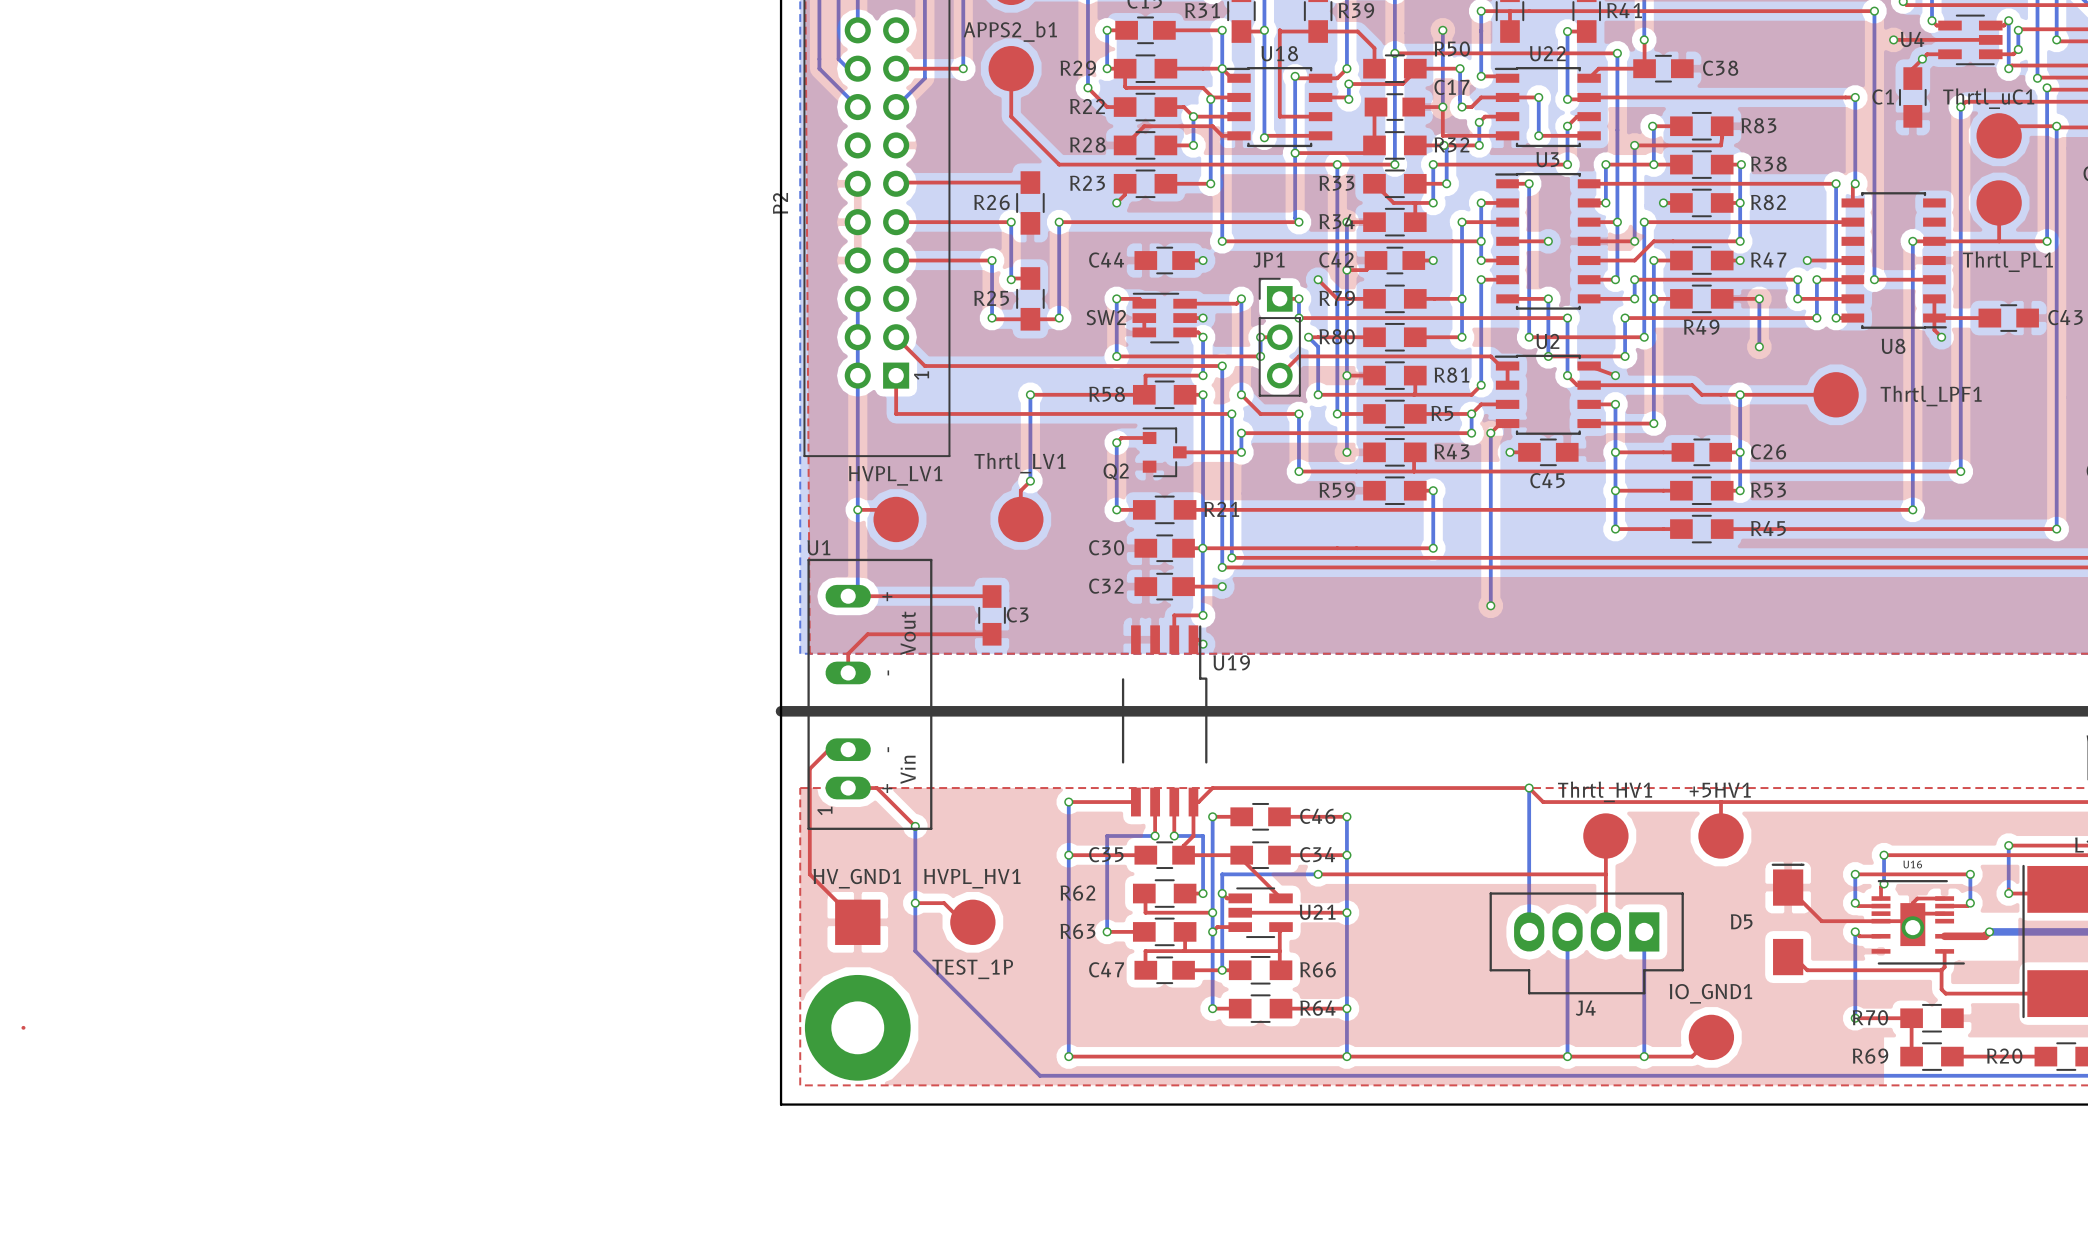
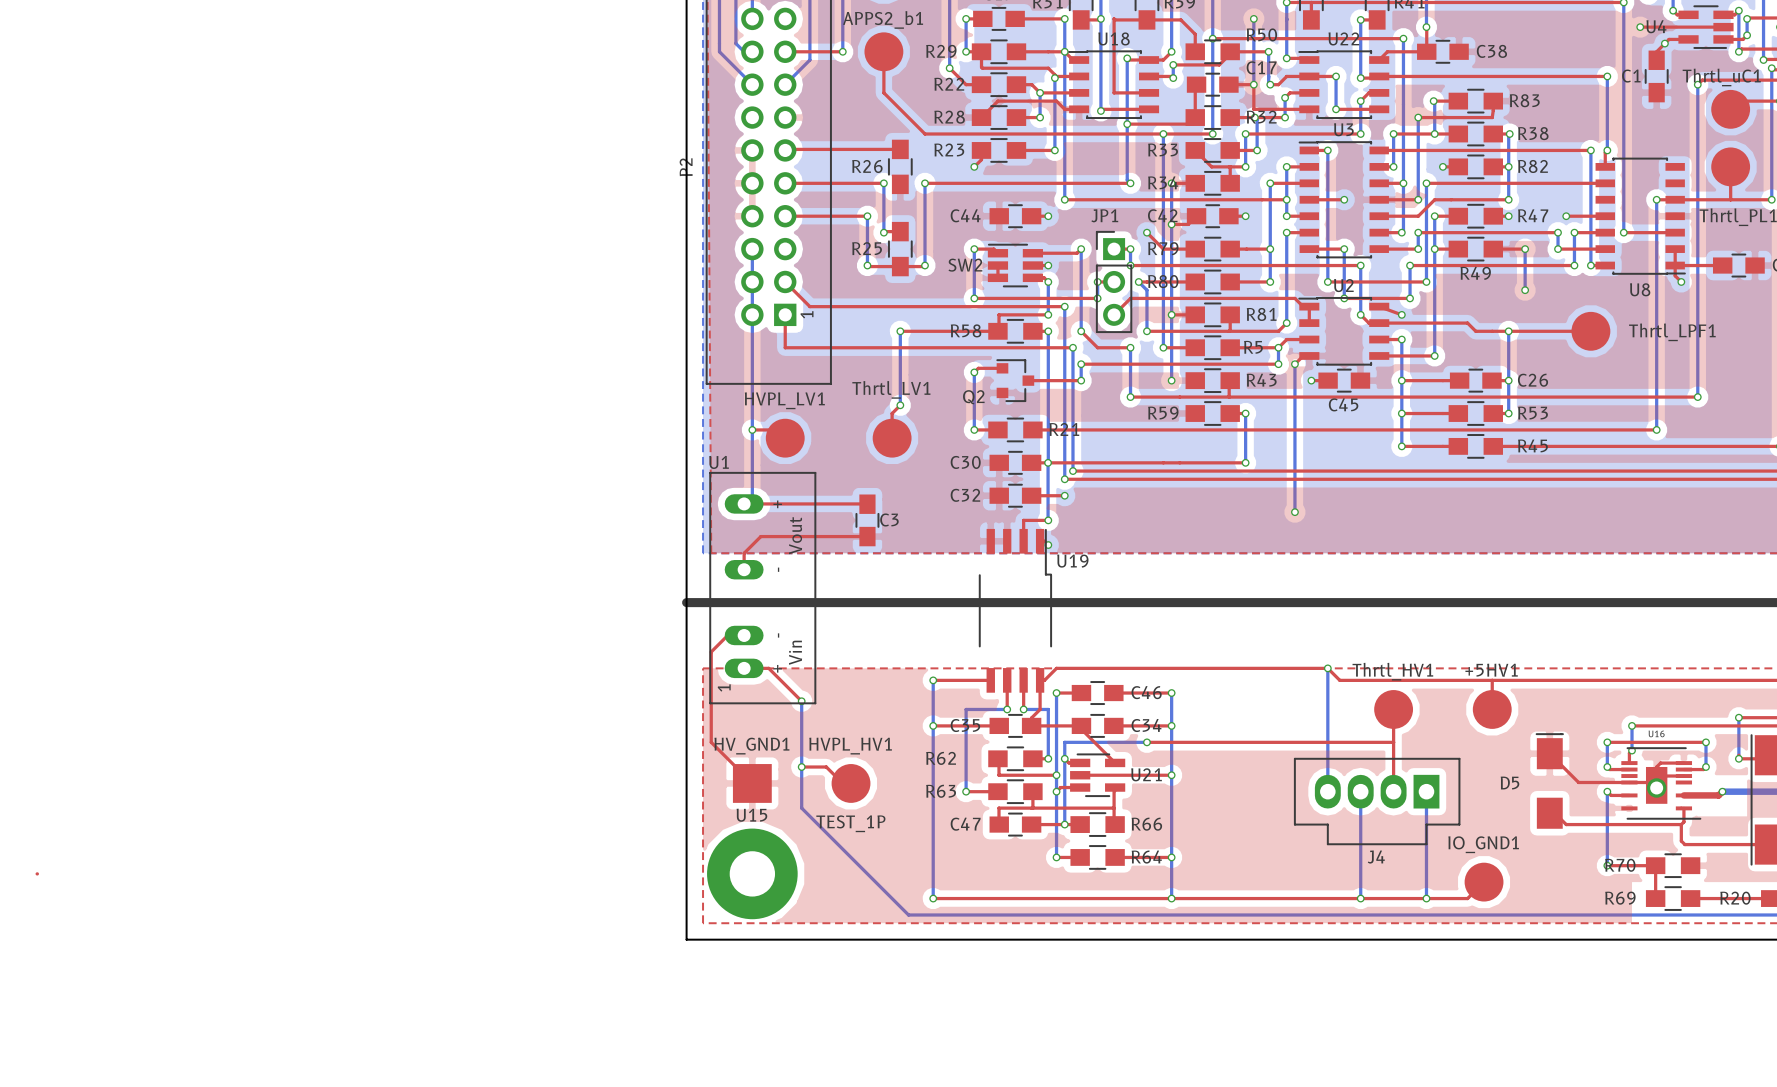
U15 name: none -> U15 (751, 815)

